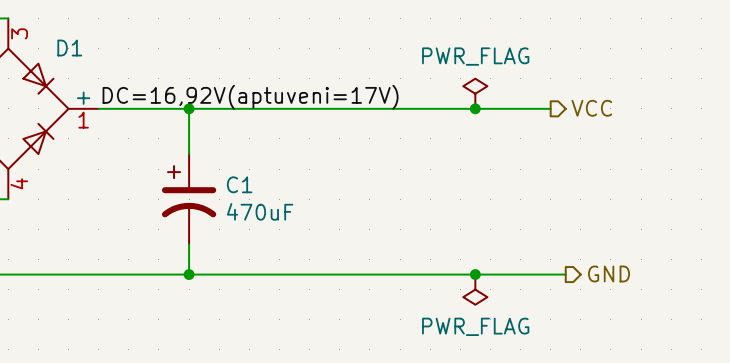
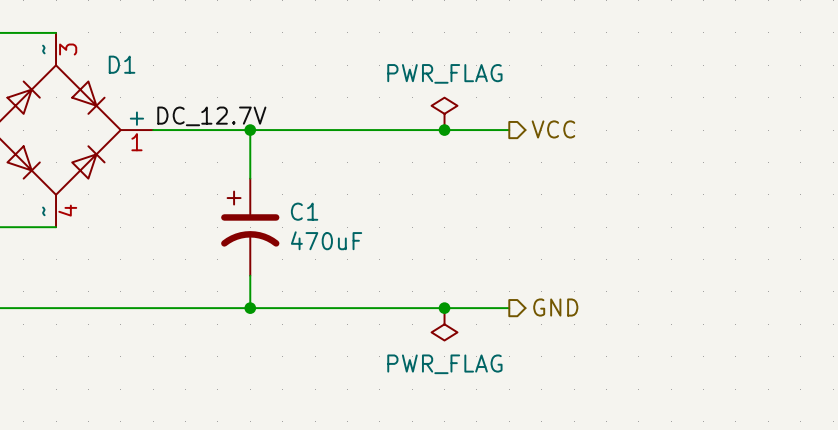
power symbol position: PWR_FLAG (475, 93) -> PWR_FLAG (444, 113)
label: DC=16,92V(aptuveni=17V) (250, 97) -> DC_12.7V (211, 116)
junction: none -> (444, 130)
wire: (430, 108) (550, 108) -> none
junction: (475, 108) -> none
hierarchical label position: VCC (591, 108) -> VCC (553, 129)
hierarchical label position: GND (609, 273) -> GND (555, 307)
junction: none -> (444, 308)
wire: (430, 274) (565, 274) -> none
junction: (475, 274) -> none
power symbol position: PWR_FLAG (475, 289) -> PWR_FLAG (444, 324)

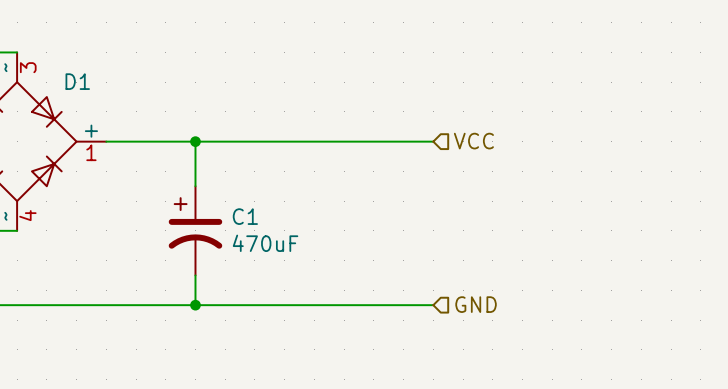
power symbol: PWR_FLAG (444, 113) -> none
label: DC_12.7V (211, 116) -> none
hierarchical label shape: output (553, 129) -> input (473, 141)
junction: (444, 130) -> none
hierarchical label shape: output (555, 307) -> input (476, 304)
junction: (444, 308) -> none
power symbol: PWR_FLAG (444, 324) -> none

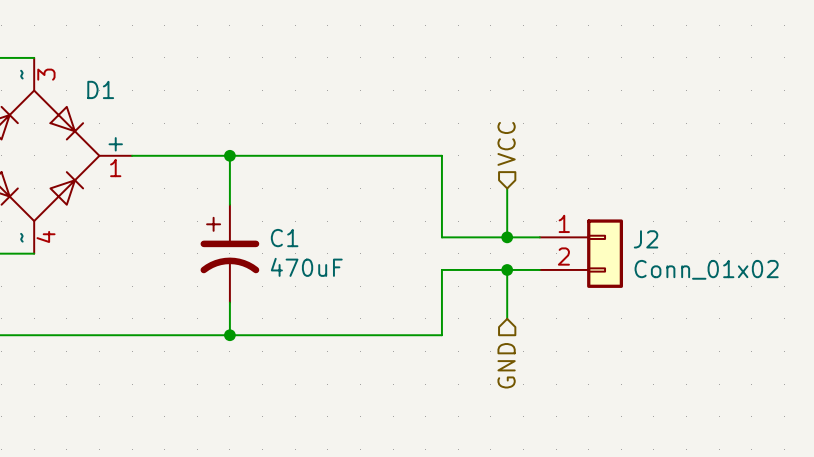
wire: (388, 141) (433, 141) -> (441, 155) (441, 237) (539, 237)
hierarchical label rotation: 0° (473, 141) -> 90° counterclockwise (506, 143)
wire: none -> (507, 188) (507, 237)
junction: none -> (507, 237)
J2: none -> Conn_01x02 (581, 253)
wire: none -> (507, 269) (507, 318)
junction: none -> (507, 269)
hierarchical label rotation: 0° (476, 304) -> 90° clockwise (506, 365)
wire: (388, 305) (433, 305) -> (441, 335) (441, 269) (539, 269)

